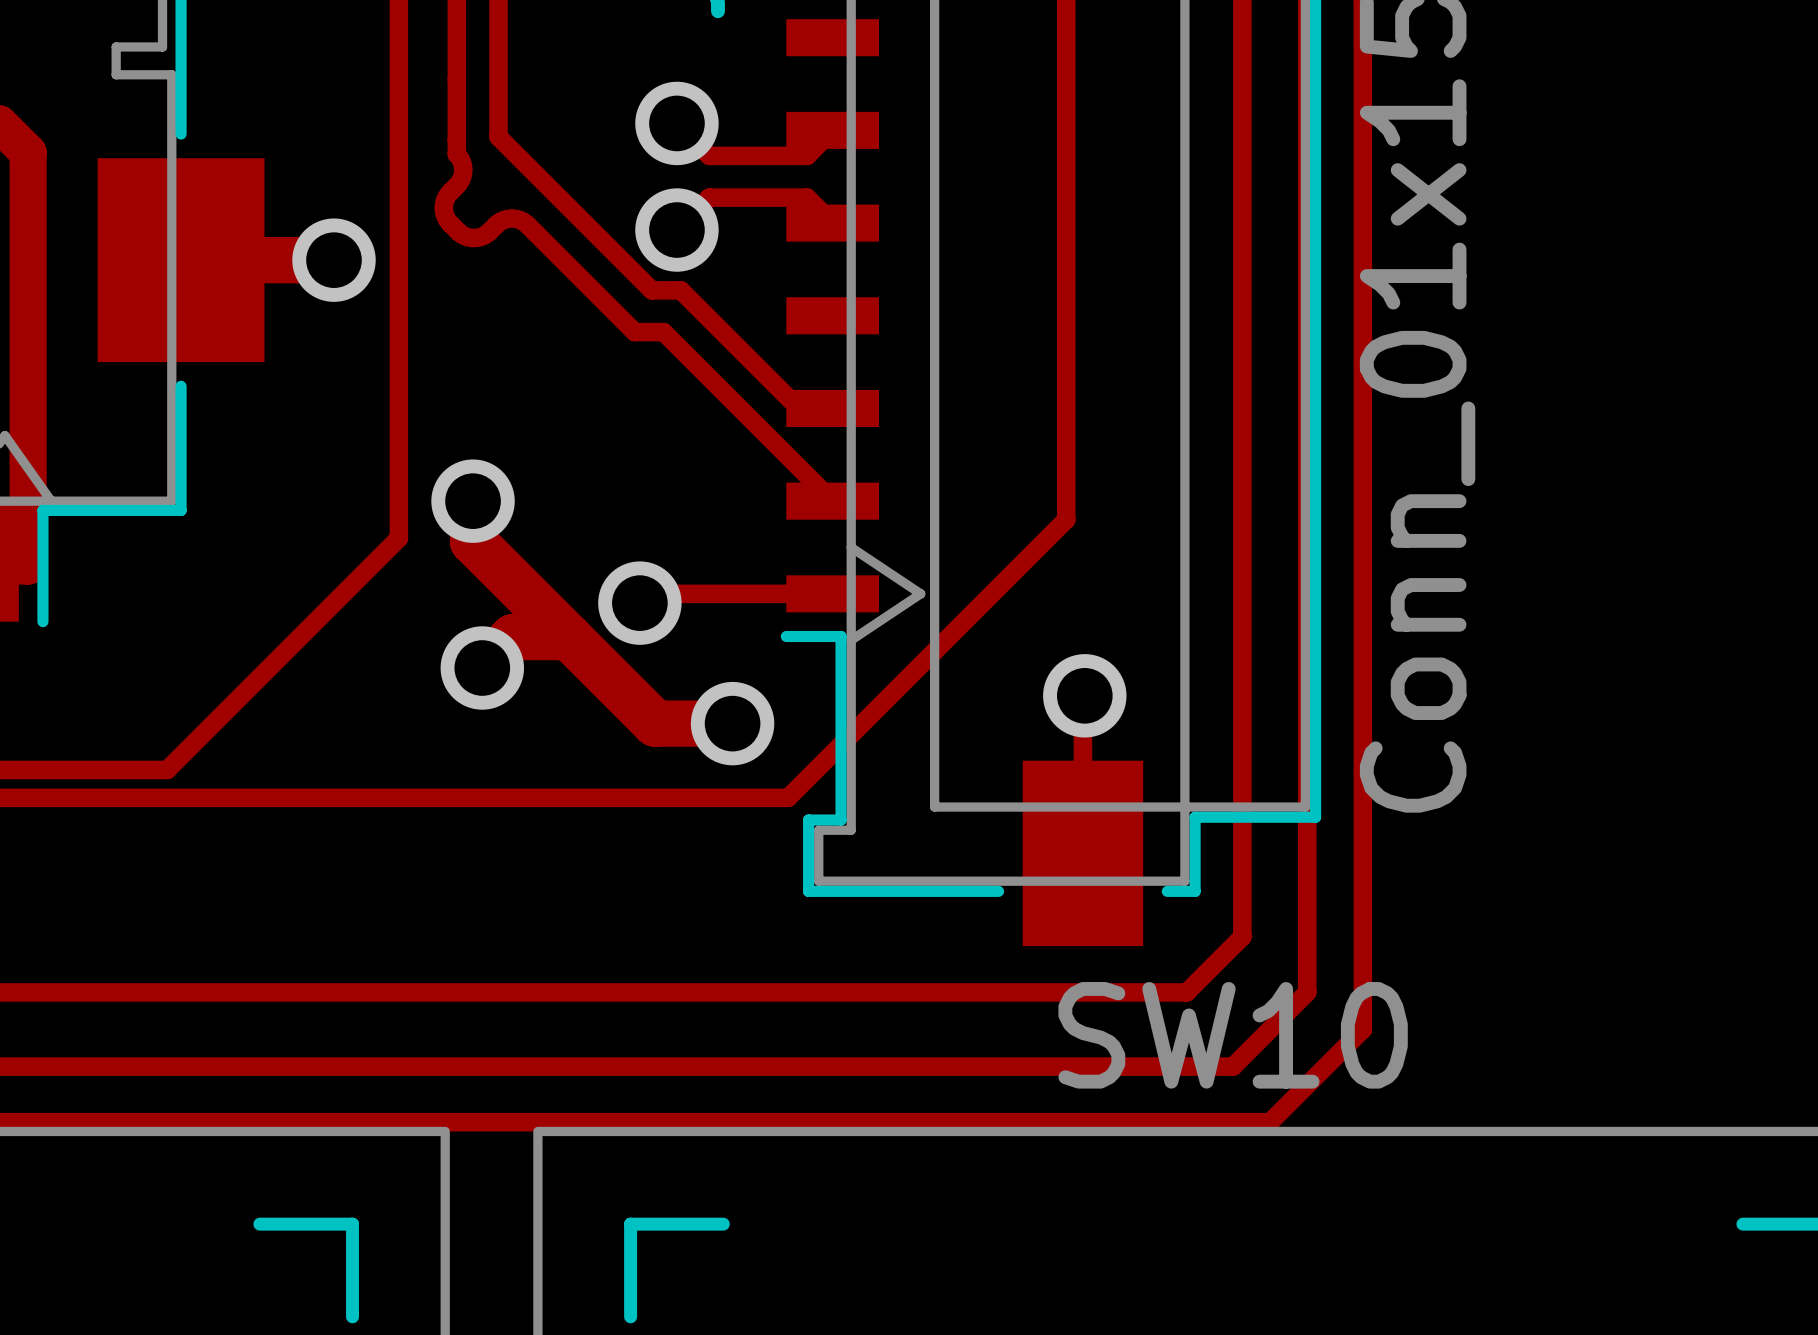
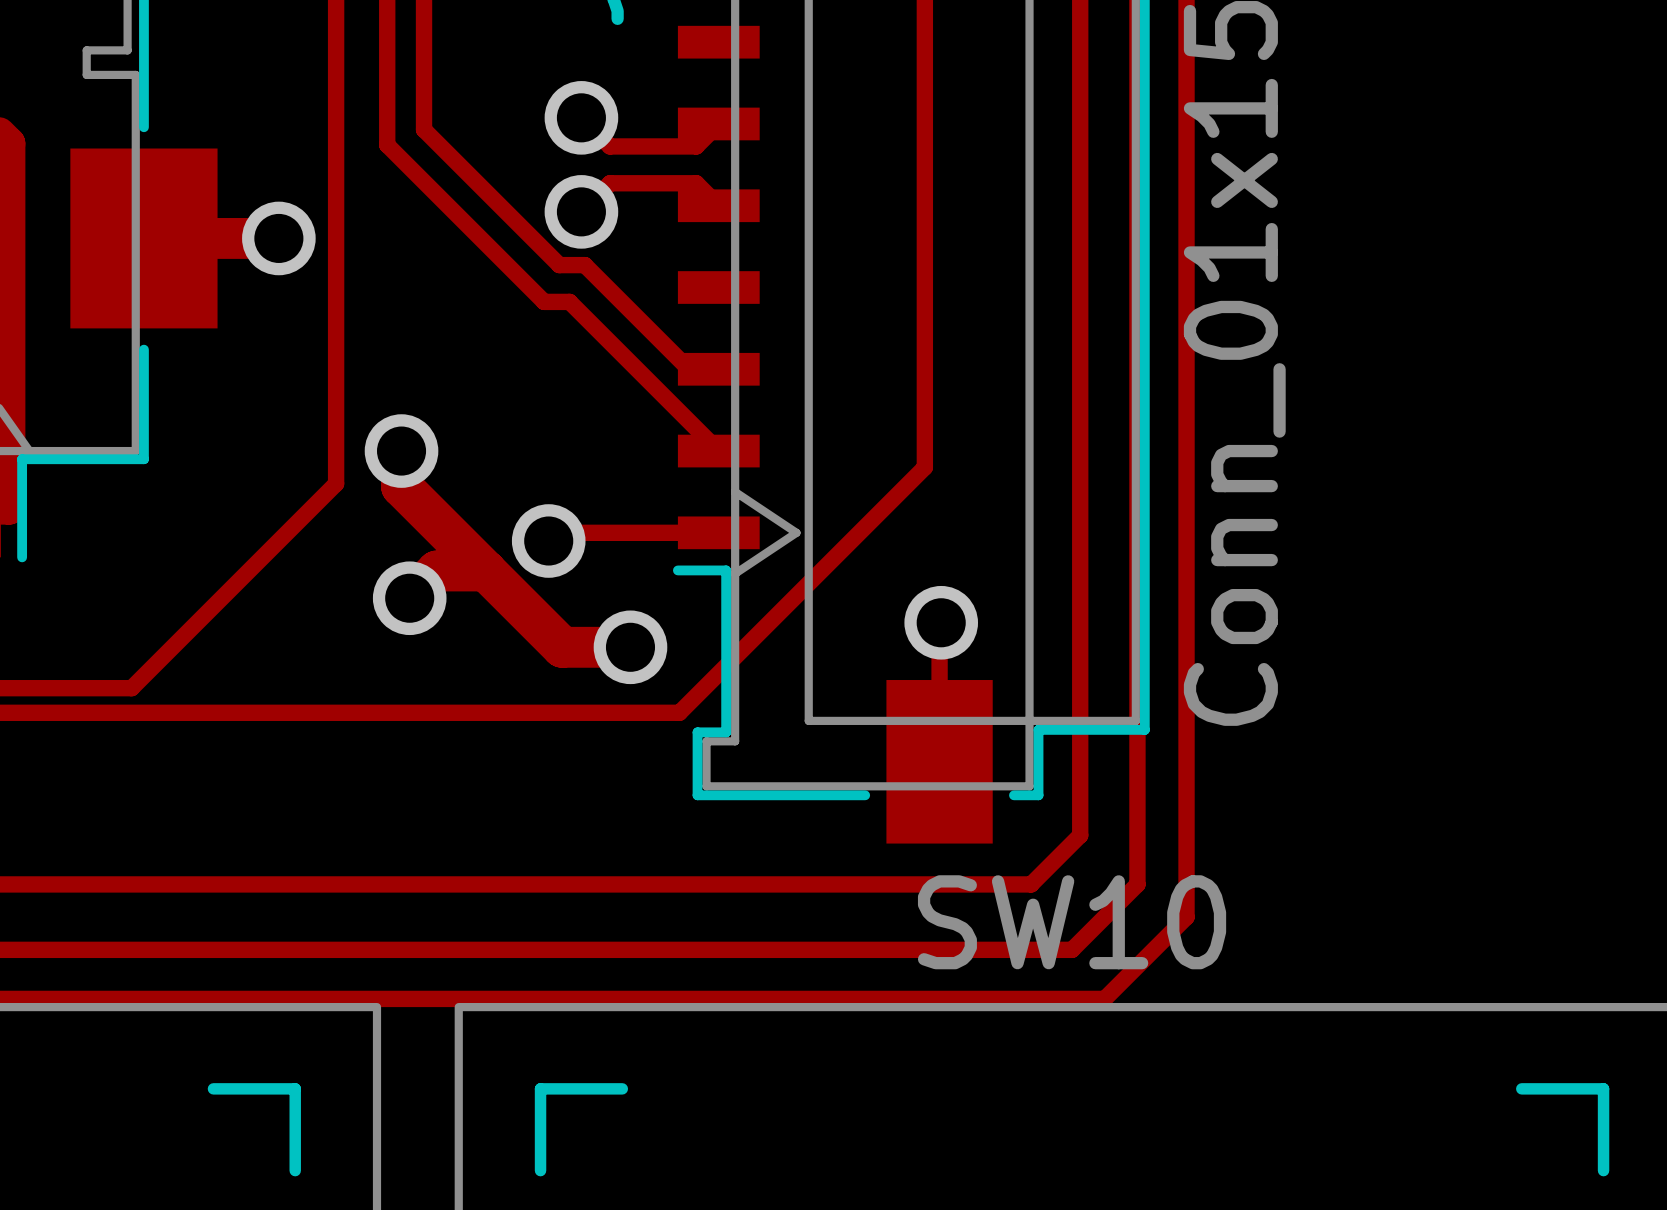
track: (456, 154) (462, 164) (462, 175) (458, 183) (446, 196) (443, 207) (446, 219) (458, 231) (466, 236) (476, 237) (485, 234) (498, 223) (506, 219) (517, 219) (527, 225) -> (387, 145) (449, 207)

